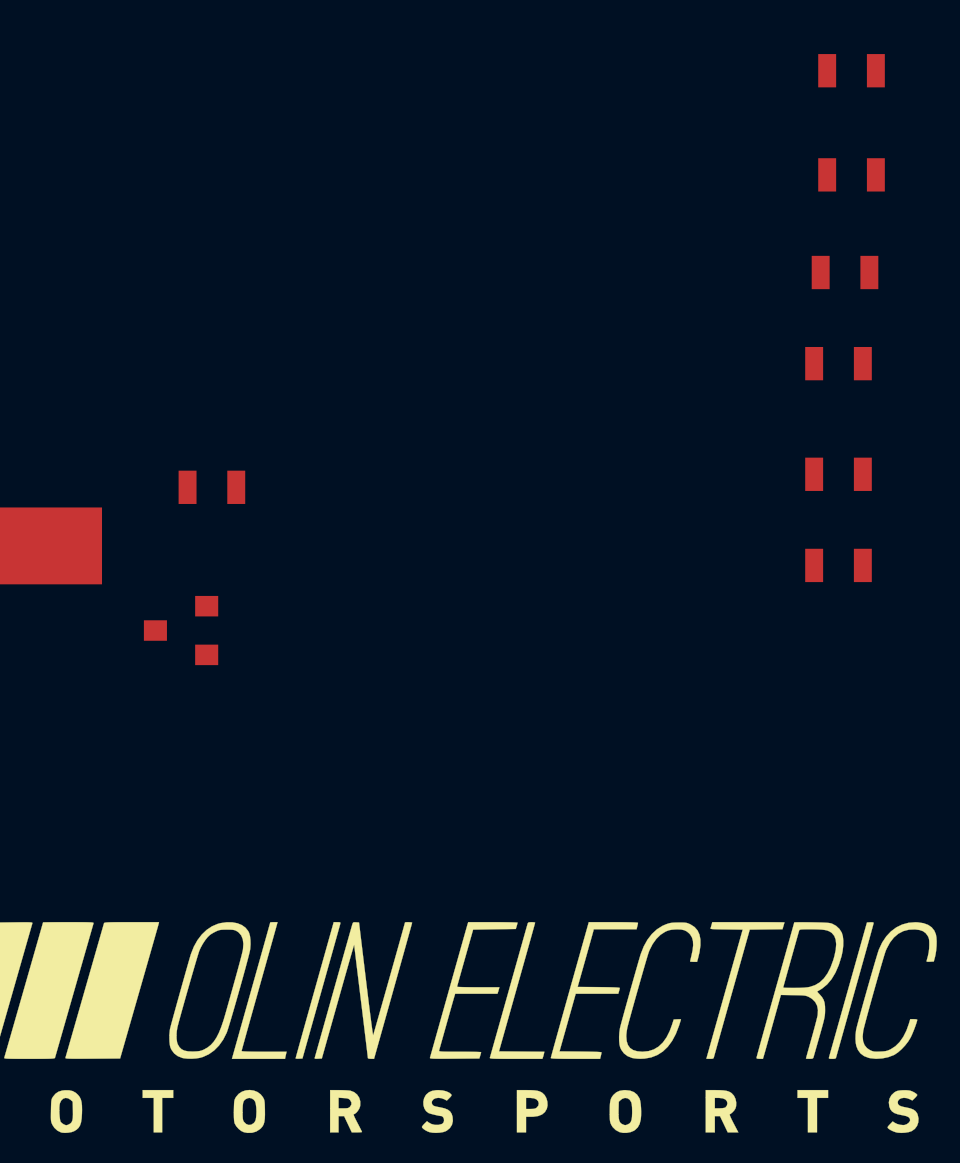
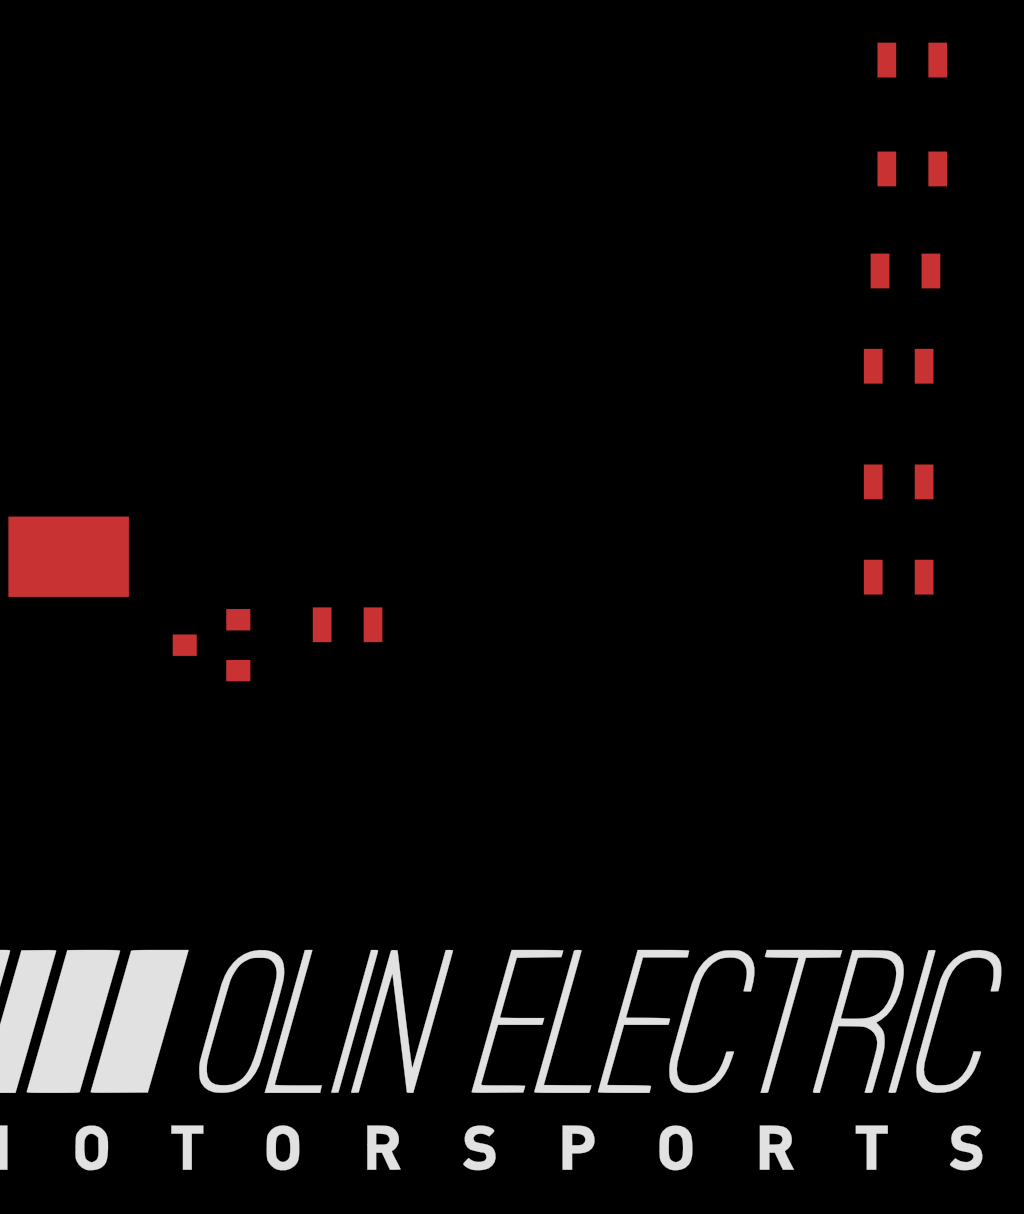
part position: (211, 487) -> (347, 624)

